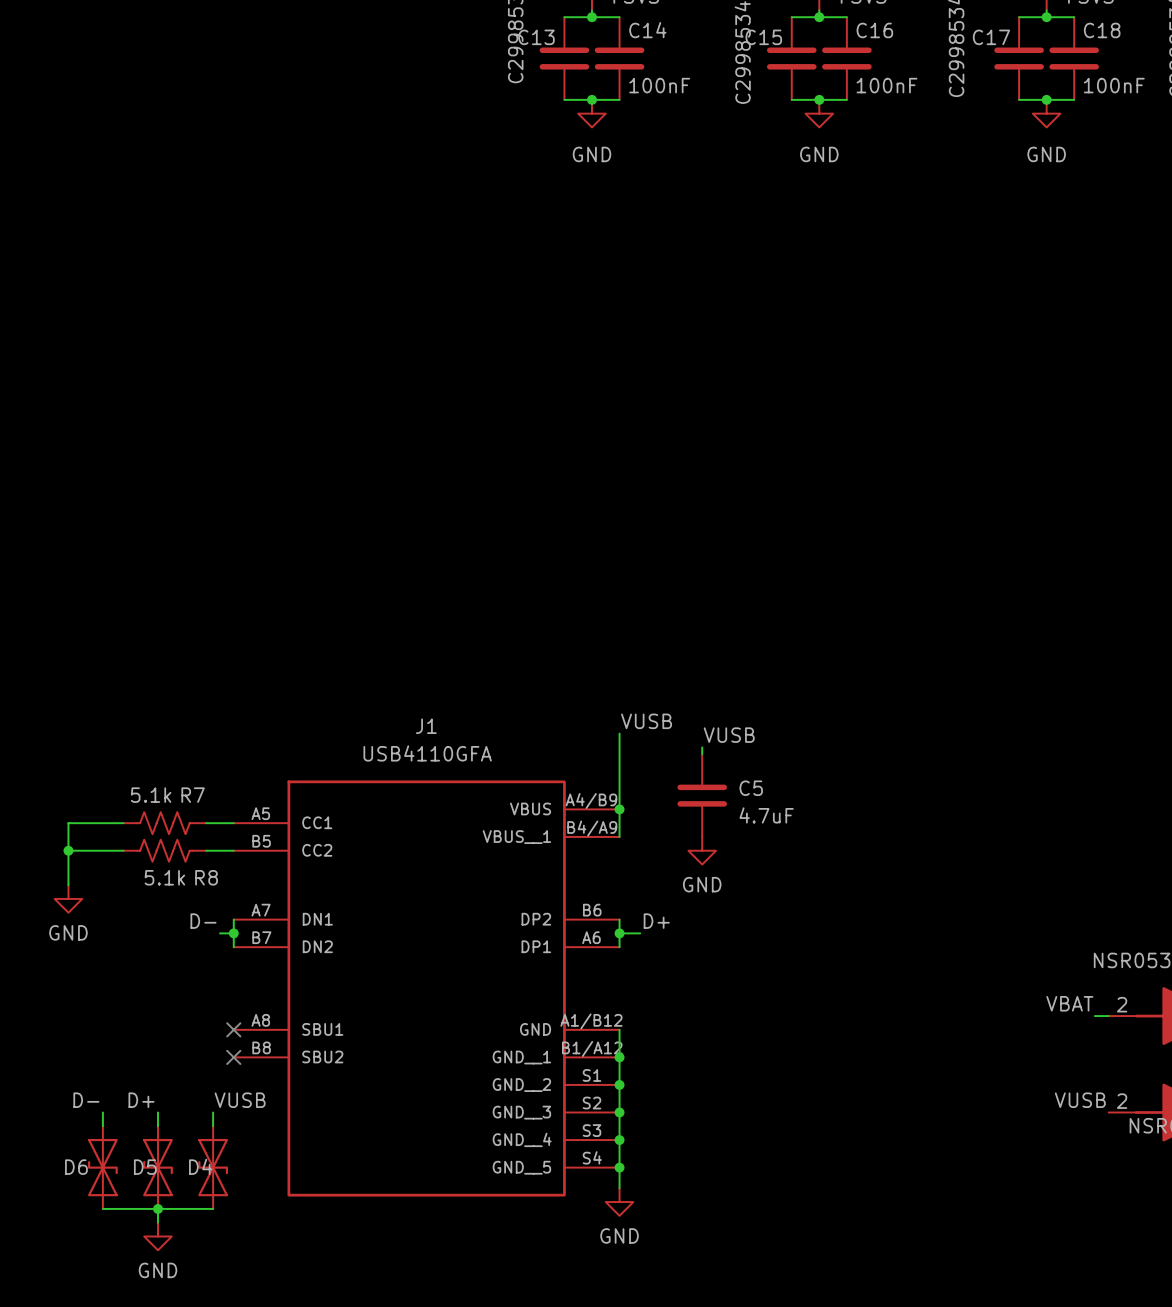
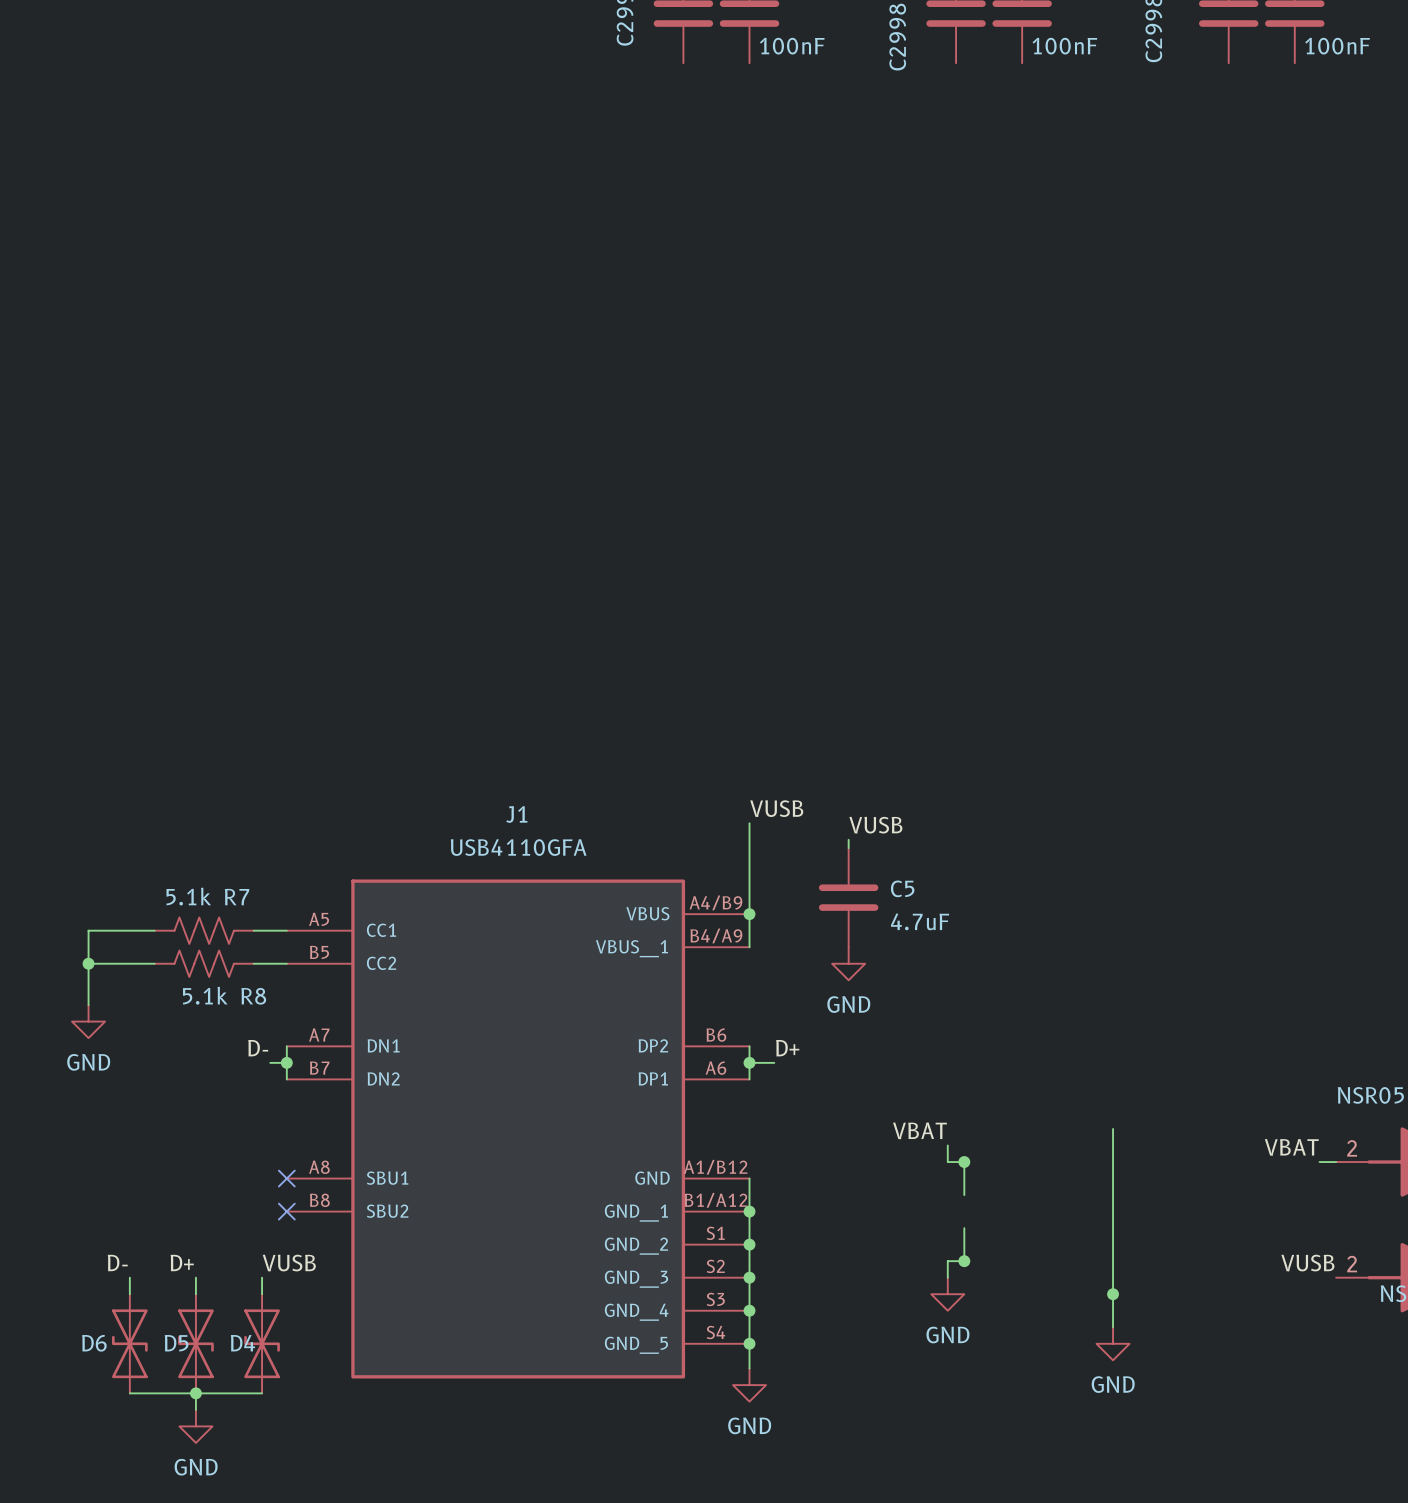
wire: (564, 99) (619, 99) -> none
junction: (591, 99) -> none
wire: (791, 99) (846, 99) -> none
junction: (819, 99) -> none
wire: (1019, 99) (1074, 99) -> none
junction: (1046, 99) -> none
power symbol: GND (591, 113) -> none
power symbol: GND (819, 113) -> none
power symbol: GND (1046, 113) -> none
wire: none -> (1113, 1128) (1113, 1327)
label: none -> VBAT (919, 1130)
wire: none -> (947, 1145) (947, 1162) (964, 1162) (964, 1195)
junction: none -> (964, 1162)
wire: none -> (964, 1228) (964, 1261) (947, 1261) (947, 1277)
junction: none -> (964, 1261)
power symbol: none -> GND (947, 1294)
junction: none -> (1113, 1294)
power symbol: none -> GND (1113, 1343)

